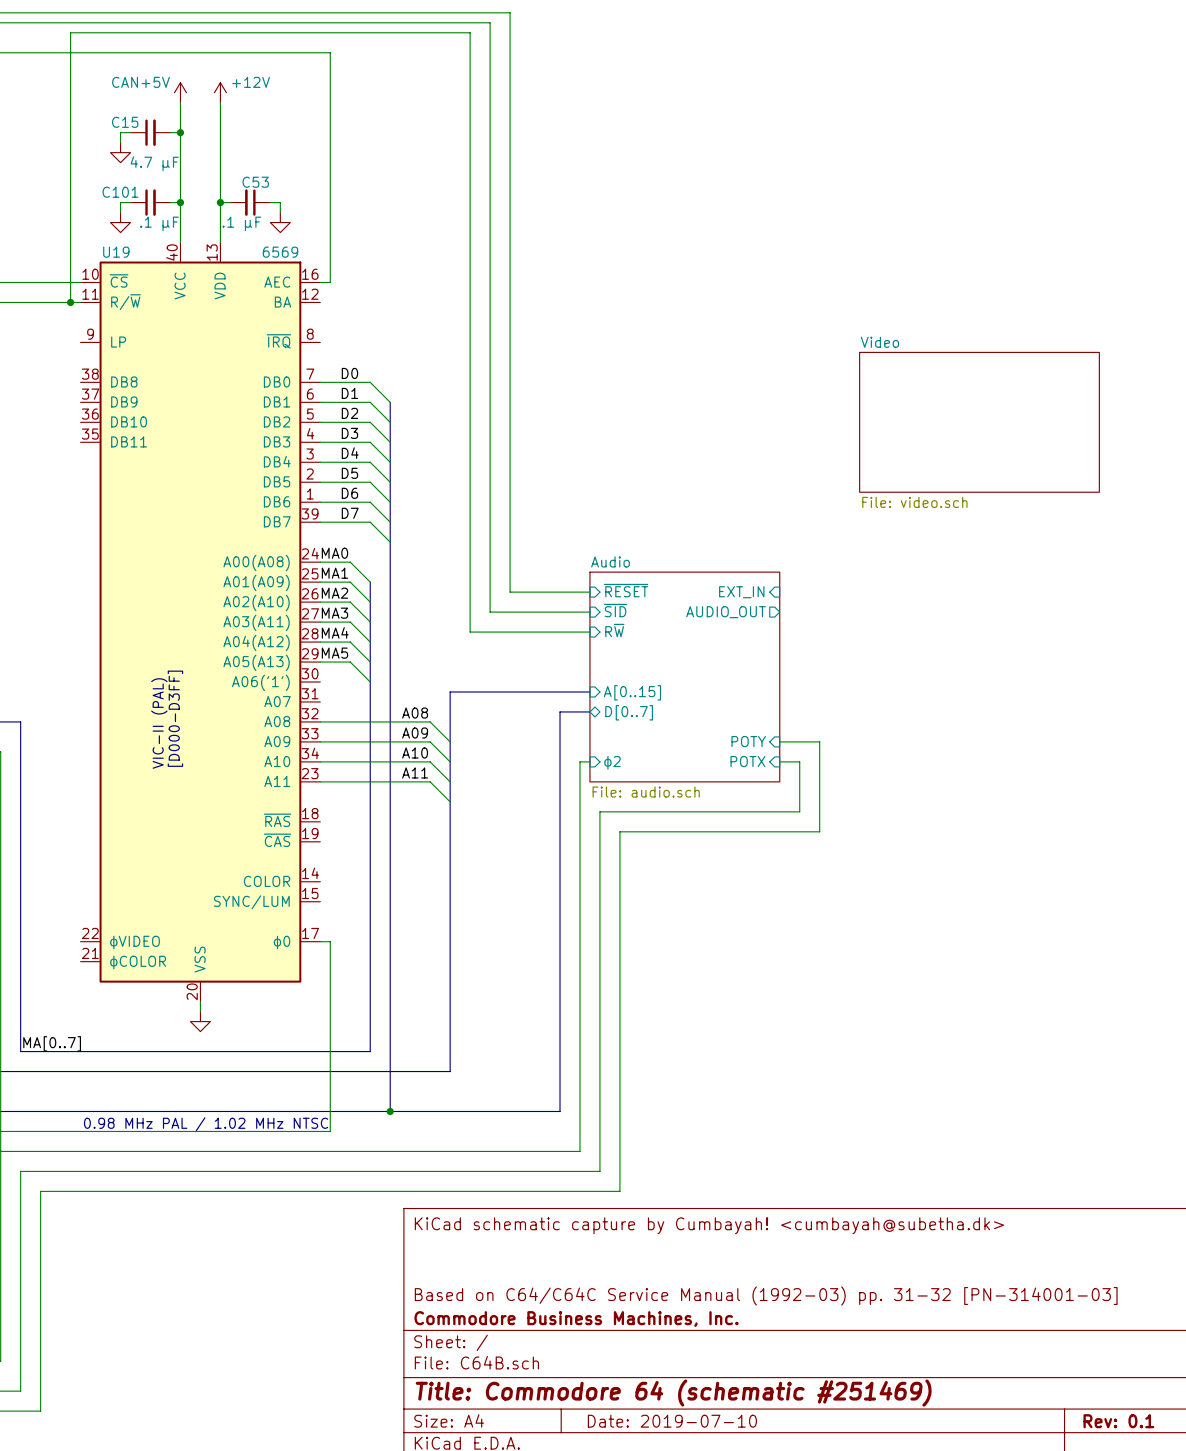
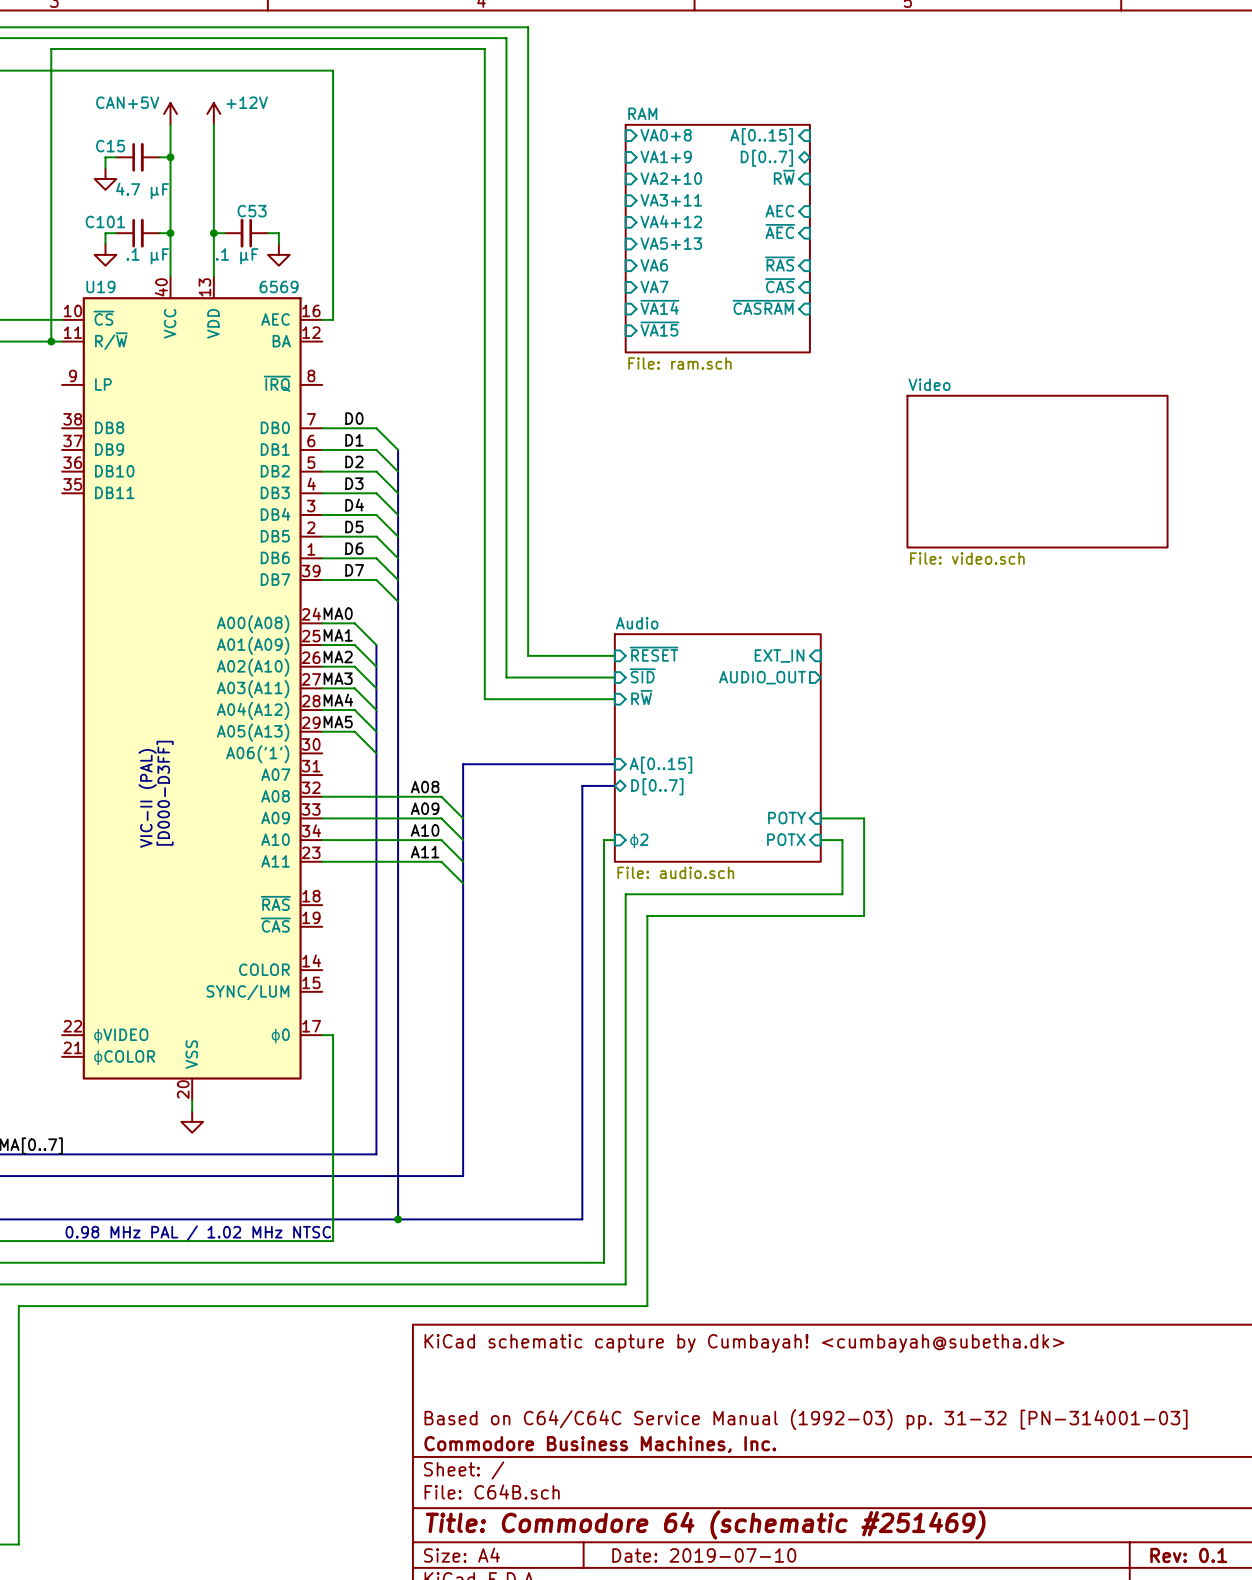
sheet pin: none -> VA0+8 (666, 135)
sheet pin: none -> A[0..15] (761, 136)
sheet pin: none -> VA1+9 (666, 156)
sheet pin: none -> D[0..7] (766, 158)
sheet pin: none -> R~{W} (784, 177)
sheet pin: none -> VA2+10 (671, 178)
sheet pin: none -> VA3+11 (671, 200)
sheet pin: none -> AEC (779, 211)
sheet pin: none -> VA4+12 (671, 221)
sheet pin: none -> ~{AEC} (780, 231)
sheet RAM: none -> File: ram.sch (717, 238)
sheet pin: none -> VA5+13 (671, 243)
sheet pin: none -> ~{RAS} (780, 264)
sheet pin: none -> VA6 (654, 265)
sheet pin: none -> ~{CAS} (780, 285)
sheet pin: none -> VA7 (654, 286)
sheet pin: none -> ~{VA14} (659, 307)
sheet pin: none -> ~{CASRAM} (763, 307)
sheet pin: none -> ~{VA15} (659, 329)

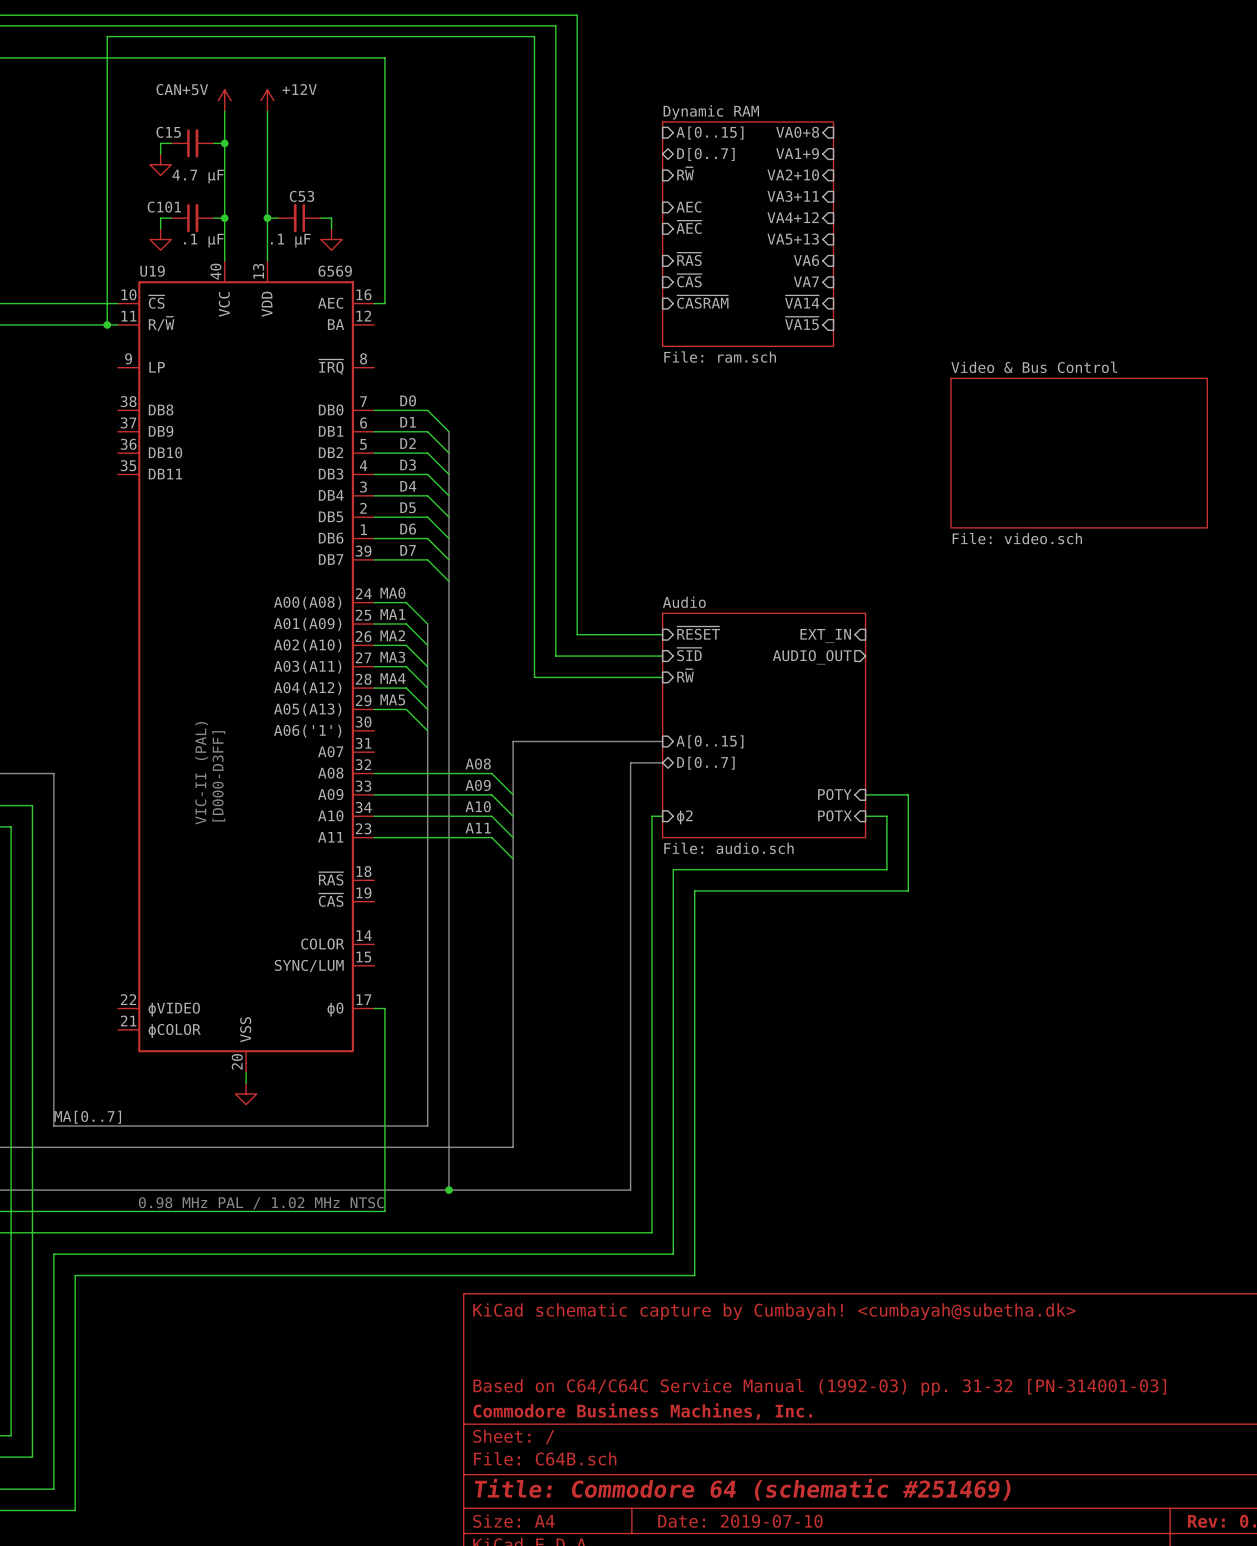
sheet pin rotation: 0° (666, 135) -> 180° (797, 132)
sheet pin position: VA0+8 (666, 135) -> VA0+8 (797, 132)
sheet pin rotation: 0° (761, 136) -> 180° (709, 133)
sheet pin rotation: 0° (666, 156) -> 180° (797, 153)
sheet pin position: VA1+9 (666, 156) -> VA1+9 (797, 153)
sheet pin rotation: 0° (766, 158) -> 180° (705, 154)
sheet pin position: D[0..7] (766, 158) -> D[0..7] (705, 154)
sheet pin rotation: 0° (784, 177) -> 180° (685, 173)
sheet pin position: R~{W} (784, 177) -> R~{W} (685, 173)
sheet pin rotation: 0° (671, 178) -> 180° (793, 175)
sheet pin rotation: 0° (671, 200) -> 180° (793, 196)
sheet pin rotation: 0° (779, 211) -> 180° (688, 207)
sheet pin position: AEC (779, 211) -> AEC (688, 207)
sheet pin rotation: 0° (671, 221) -> 180° (793, 217)
sheet pin rotation: 0° (780, 231) -> 180° (689, 227)
sheet pin position: ~{AEC} (780, 231) -> ~{AEC} (689, 227)
sheet RAM: File: ram.sch (717, 238) -> none
sheet pin rotation: 0° (671, 243) -> 180° (793, 239)
sheet Dynamic RAM: none -> File: ram.sch (748, 234)
sheet pin rotation: 0° (780, 264) -> 180° (689, 259)
sheet pin position: ~{RAS} (780, 264) -> ~{RAS} (689, 259)
sheet pin rotation: 0° (654, 265) -> 180° (806, 260)
sheet pin position: VA6 (654, 265) -> VA6 (806, 260)
sheet pin rotation: 0° (780, 285) -> 180° (689, 280)
sheet pin position: ~{CAS} (780, 285) -> ~{CAS} (689, 280)
sheet pin rotation: 0° (654, 286) -> 180° (806, 281)
sheet pin position: VA7 (654, 286) -> VA7 (806, 281)
sheet pin rotation: 0° (659, 307) -> 180° (802, 301)
sheet pin rotation: 0° (763, 307) -> 180° (702, 302)
sheet pin rotation: 0° (659, 329) -> 180° (801, 323)
sheet Video name: Video (929, 384) -> Video & Bus Control (1034, 367)

